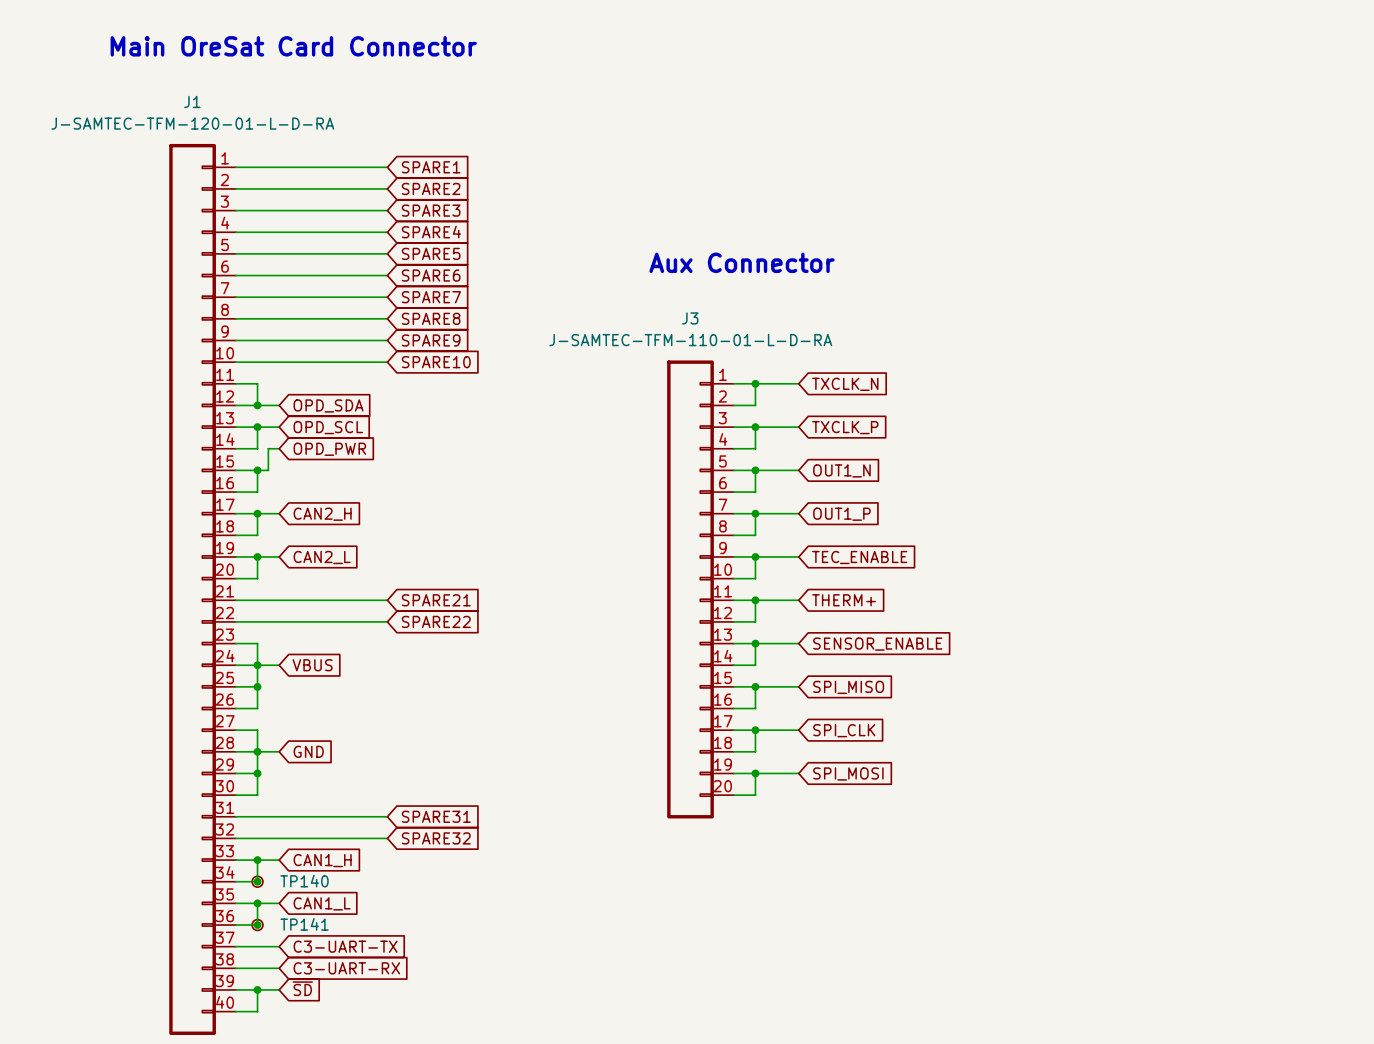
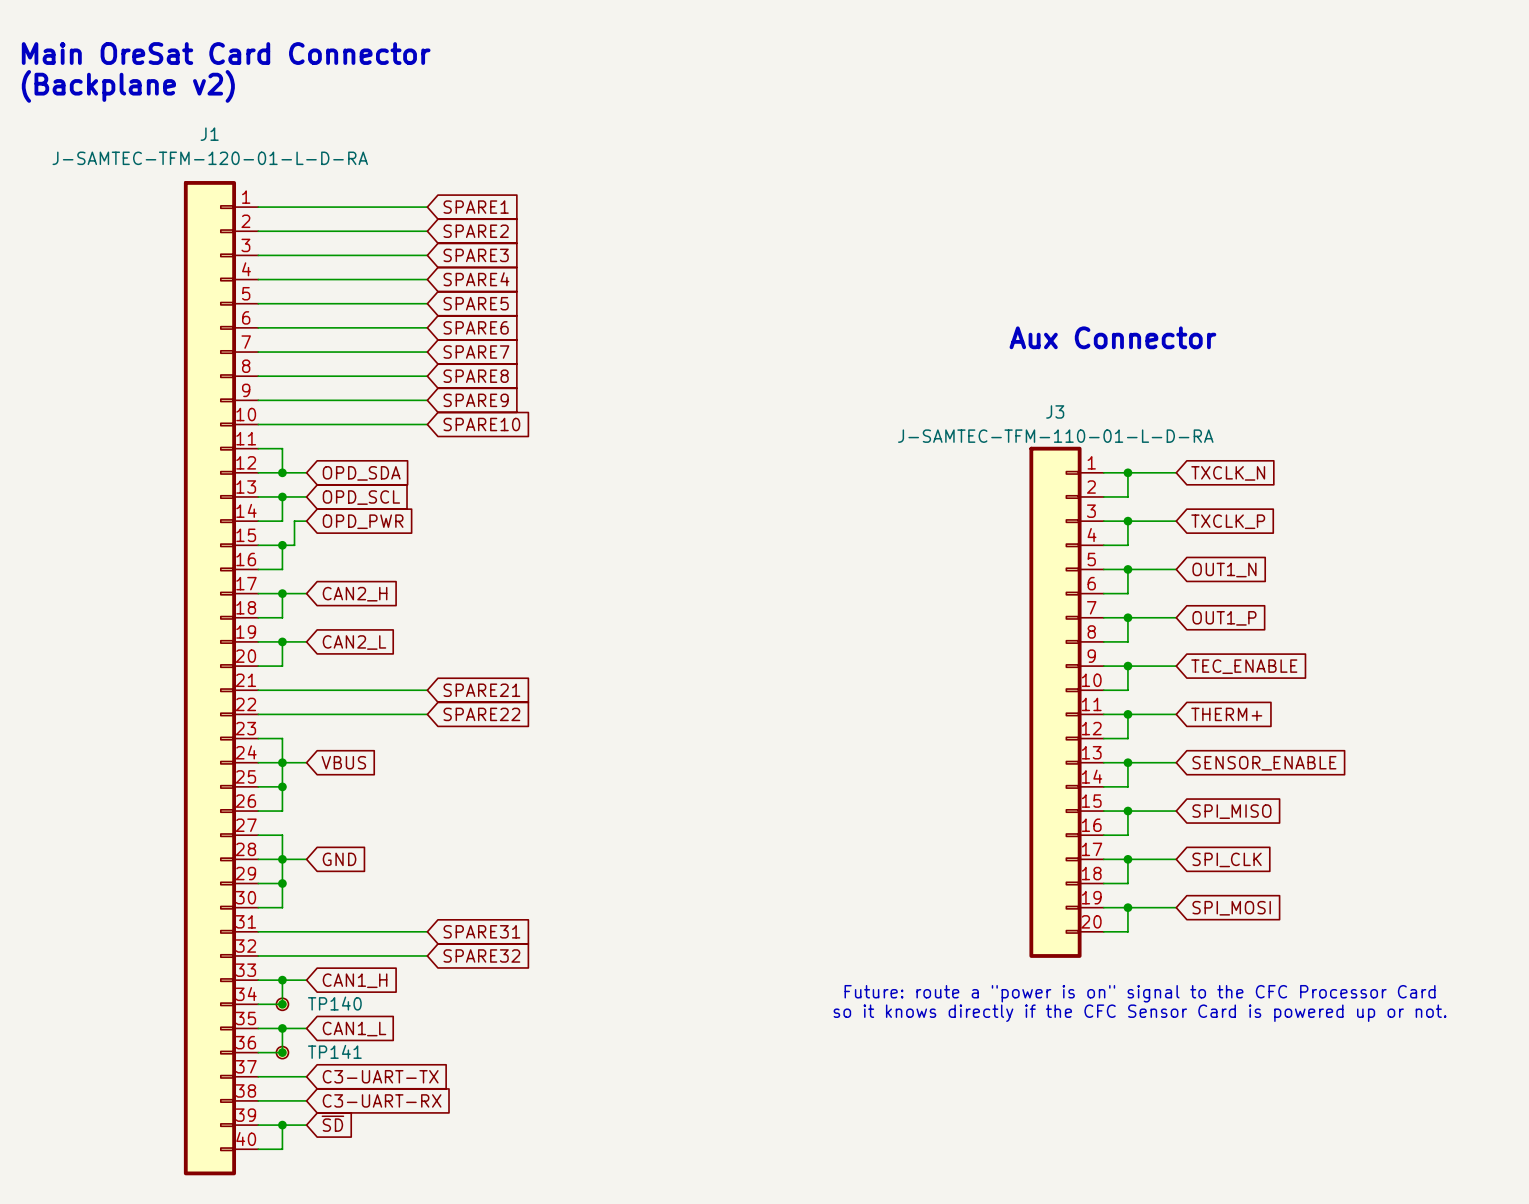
text position: Main OreSat Card Connector (293, 46) -> Main OreSat Card Connector (226, 53)
text: none -> (Backplane v2) (128, 86)
J1 symbol: [169, 143, 236, 1035] -> [183, 181, 259, 1176]
text: Aux Connector (741, 262) -> none
text: none -> Aux Connector (1112, 337)
J3 symbol: [667, 360, 734, 819] -> [1029, 446, 1104, 958]
wire: (733, 383) (798, 383) -> none
wire: (755, 383) (755, 405) (733, 405) -> none
junction: (755, 383) -> none
global label: TXCLK_N (845, 384) -> none
wire: none -> (1103, 472) (1176, 472)
wire: none -> (1127, 472) (1127, 496) (1103, 496)
junction: none -> (1127, 472)
global label: none -> TXCLK_N (1228, 473)
wire: (733, 427) (798, 427) -> none
wire: (755, 427) (755, 448) (733, 448) -> none
junction: (755, 427) -> none
global label: TXCLK_P (845, 427) -> none
wire: none -> (1103, 521) (1176, 521)
wire: none -> (1127, 521) (1127, 545) (1103, 545)
junction: none -> (1127, 521)
global label: none -> TXCLK_P (1228, 521)
wire: (733, 470) (798, 470) -> none
wire: (755, 470) (755, 492) (733, 492) -> none
junction: (755, 470) -> none
global label: OUT1_N (841, 470) -> none
wire: none -> (1103, 569) (1176, 569)
wire: none -> (1127, 569) (1127, 593) (1103, 593)
junction: none -> (1127, 569)
global label: none -> OUT1_N (1224, 570)
wire: (733, 513) (798, 513) -> none
wire: (755, 513) (755, 535) (733, 535) -> none
junction: (755, 513) -> none
global label: OUT1_P (841, 514) -> none
wire: none -> (1103, 617) (1176, 617)
wire: none -> (1127, 617) (1127, 641) (1103, 641)
junction: none -> (1127, 617)
global label: none -> OUT1_P (1224, 618)
wire: (733, 556) (798, 556) -> none
wire: (755, 556) (755, 578) (733, 578) -> none
junction: (755, 556) -> none
global label: TEC_ENABLE (859, 557) -> none
wire: none -> (1103, 666) (1176, 666)
wire: none -> (1127, 666) (1127, 690) (1103, 690)
junction: none -> (1127, 666)
global label: none -> TEC_ENABLE (1244, 666)
wire: (733, 600) (798, 600) -> none
wire: (755, 600) (755, 621) (733, 621) -> none
junction: (755, 600) -> none
global label: THERM+ (844, 600) -> none
wire: none -> (1103, 714) (1176, 714)
wire: none -> (1127, 714) (1127, 738) (1103, 738)
junction: none -> (1127, 714)
global label: none -> THERM+ (1226, 714)
wire: (733, 643) (798, 643) -> none
wire: (755, 643) (755, 665) (733, 665) -> none
junction: (755, 643) -> none
global label: SENSOR_ENABLE (877, 644) -> none
wire: none -> (1103, 762) (1176, 762)
wire: none -> (1127, 762) (1127, 786) (1103, 786)
junction: none -> (1127, 762)
global label: none -> SENSOR_ENABLE (1264, 763)
wire: (733, 686) (798, 686) -> none
wire: (755, 686) (755, 708) (733, 708) -> none
junction: (755, 686) -> none
global label: SPI_MISO (848, 687) -> none
wire: none -> (1103, 811) (1176, 811)
wire: none -> (1127, 811) (1127, 835) (1103, 835)
junction: none -> (1127, 811)
global label: none -> SPI_MISO (1231, 811)
wire: (733, 730) (798, 730) -> none
wire: (755, 730) (755, 751) (733, 751) -> none
junction: (755, 730) -> none
global label: SPI_CLK (844, 730) -> none
wire: none -> (1103, 859) (1176, 859)
wire: none -> (1127, 859) (1127, 883) (1103, 883)
junction: none -> (1127, 859)
global label: none -> SPI_CLK (1227, 859)
wire: (733, 773) (798, 773) -> none
wire: (755, 773) (755, 795) (733, 795) -> none
junction: (755, 773) -> none
global label: SPI_MOSI (848, 773) -> none
wire: none -> (1103, 907) (1176, 907)
wire: none -> (1127, 907) (1127, 931) (1103, 931)
junction: none -> (1127, 907)
global label: none -> SPI_MOSI (1231, 908)
text: none -> Future: route a "power is on" signal to the CFC Processor Card (1140, 993)
text: none -> so it knows directly if the CFC Sensor Card is powered up or not. (1140, 1013)

